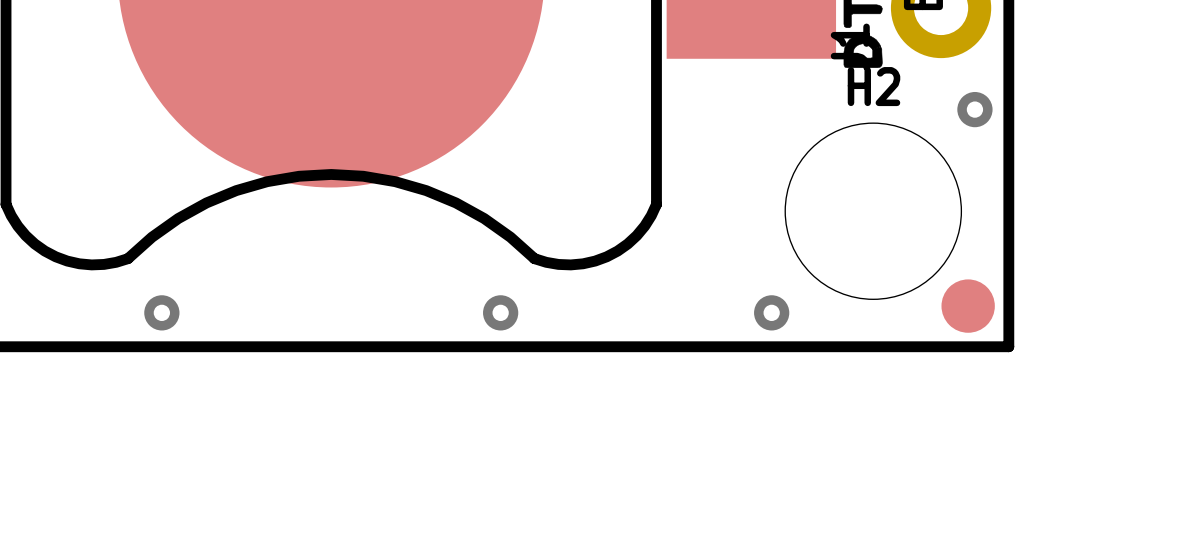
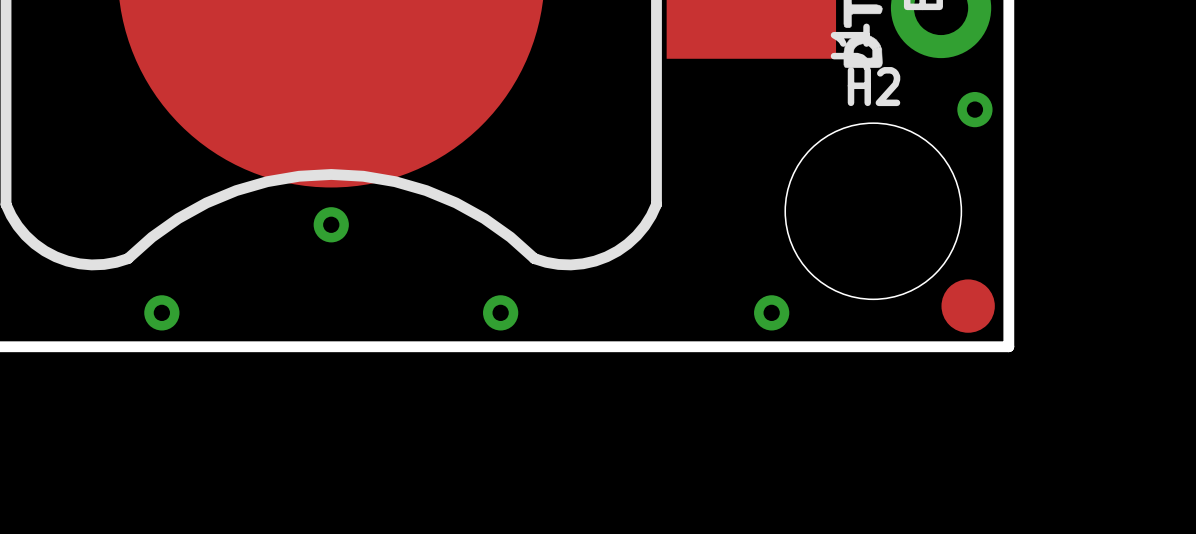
via: none -> (331, 224)

